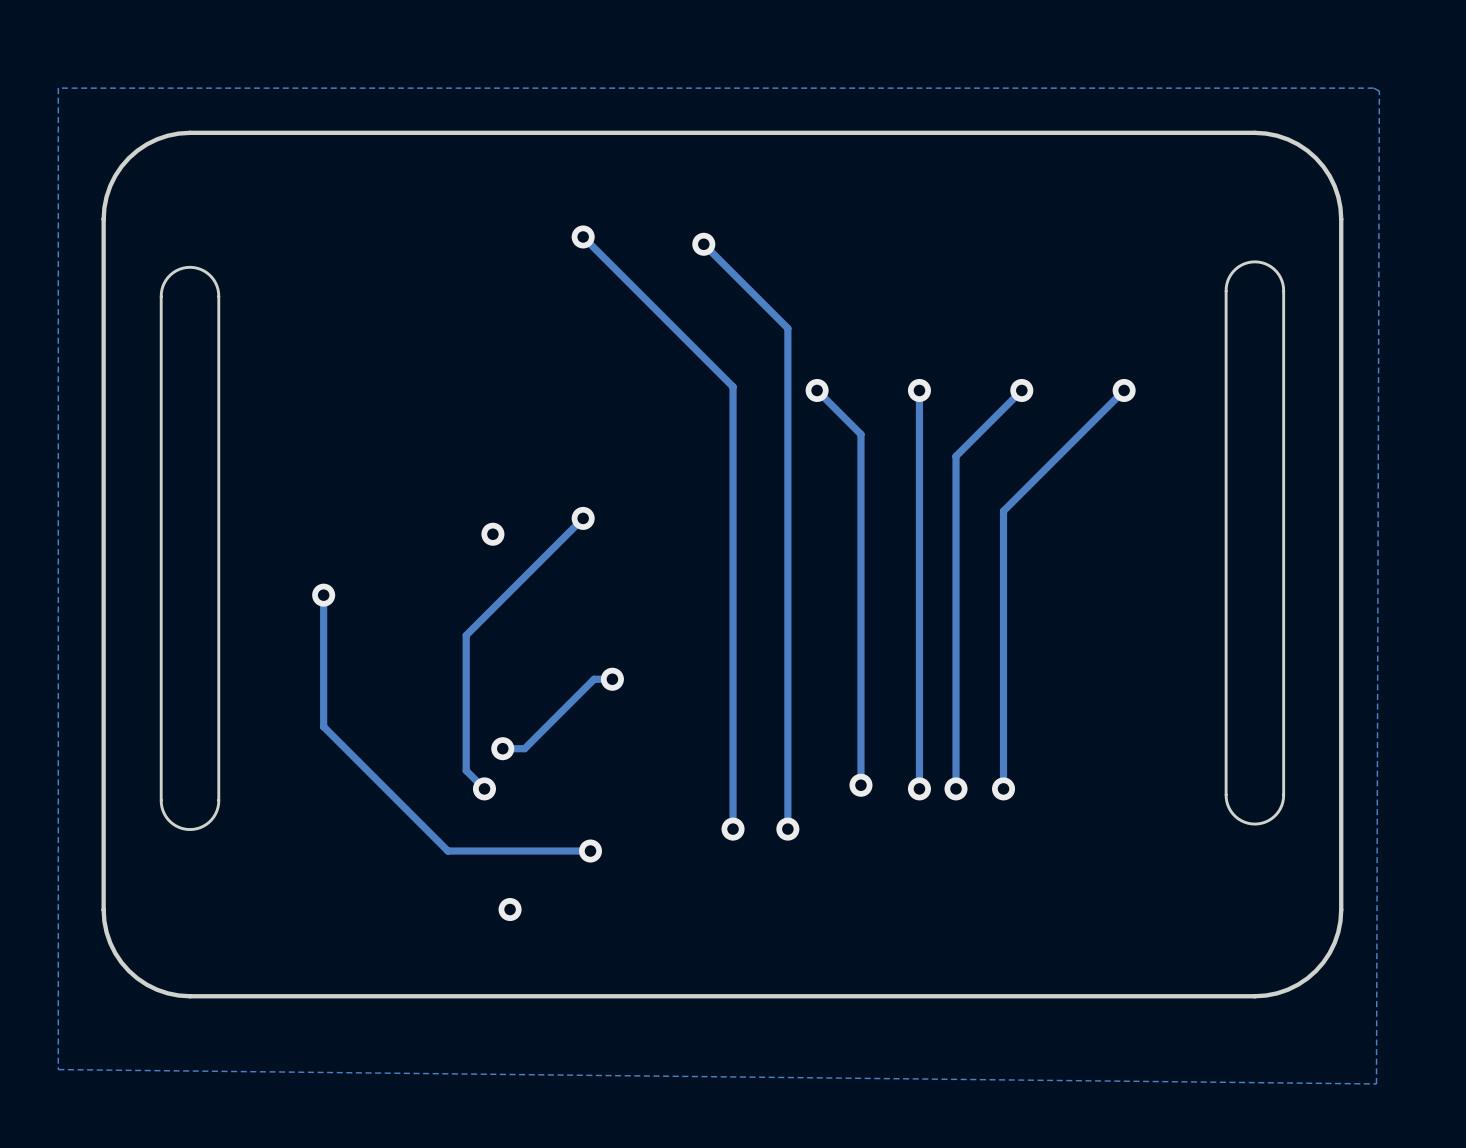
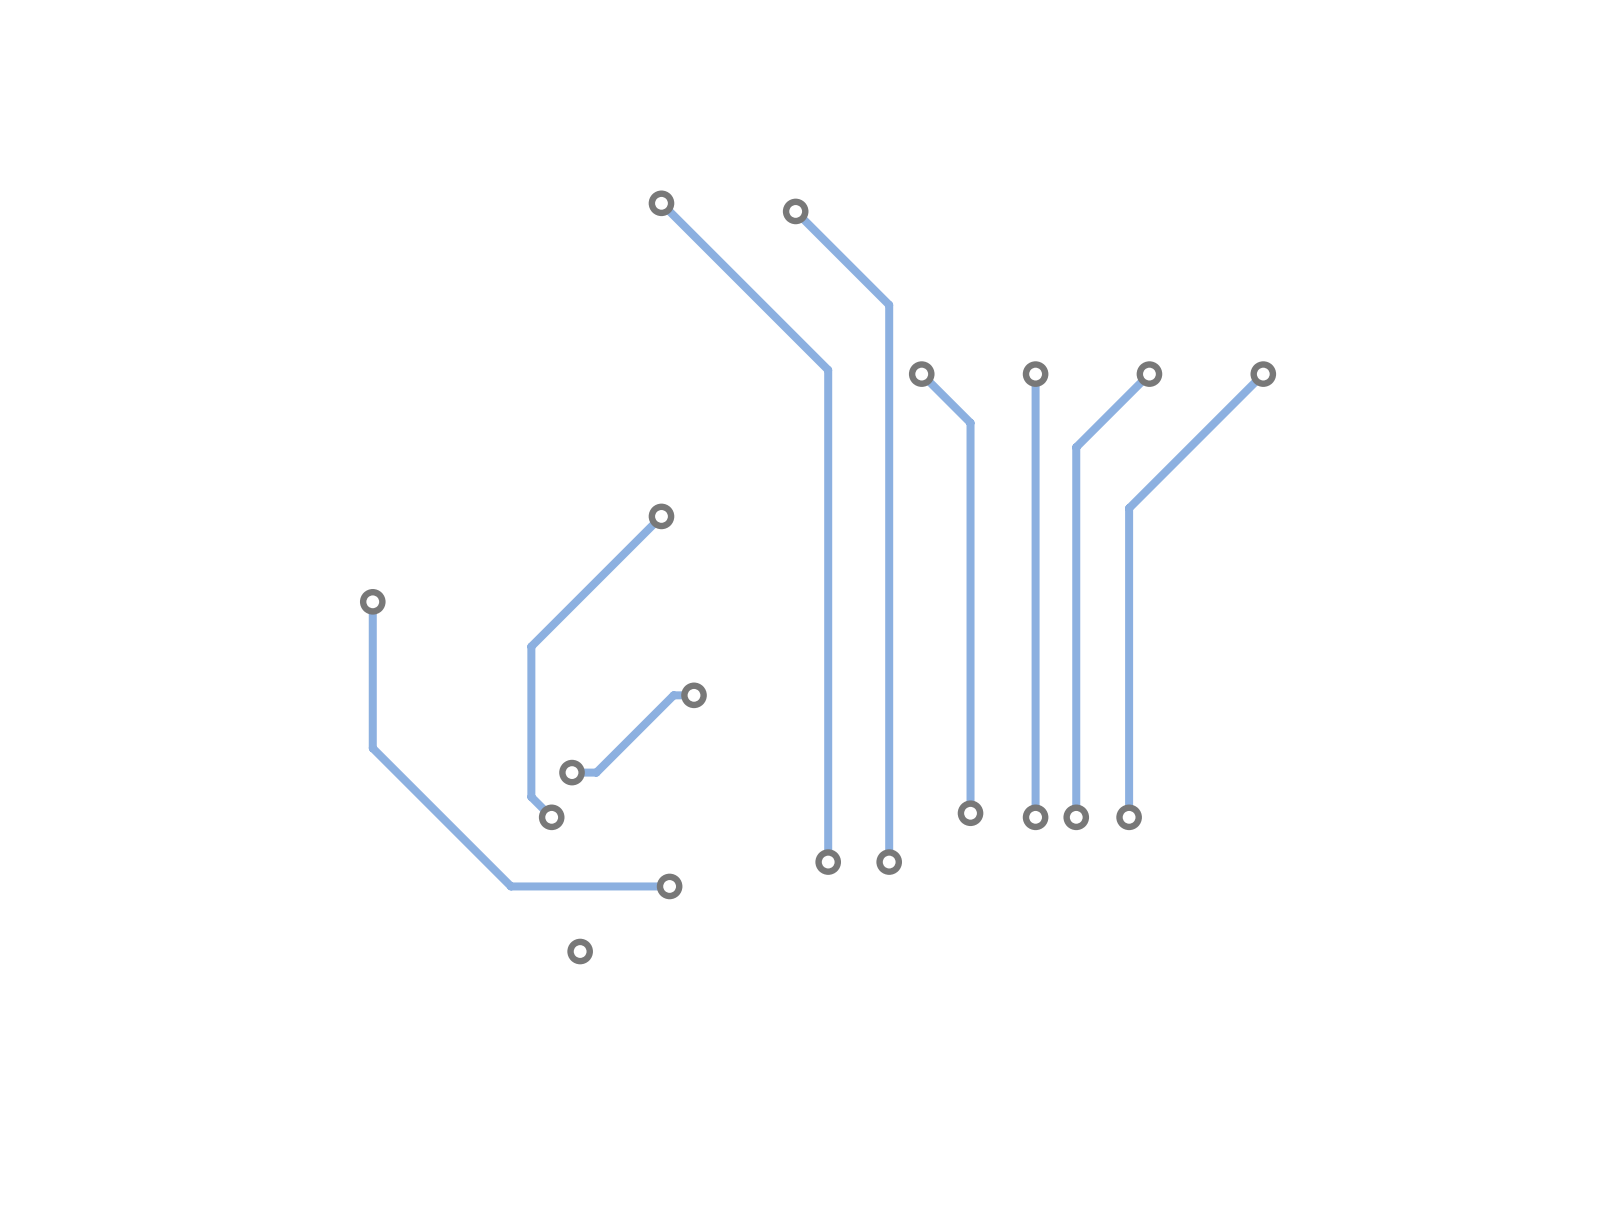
zone outline: (1373, 88) (1379, 91) (1376, 1083) (58, 1069) (58, 88) (1373, 88) -> none
board edge: (1254, 132) (189, 132) (167, 135) (137, 150) (121, 166) (110, 186) (103, 219) (103, 909) (110, 942) (121, 962) (146, 984) (167, 993) (189, 996) (1254, 996) (1277, 993) (1307, 978) (1329, 953) (1338, 932) (1341, 909) (1341, 219) (1334, 186) (1315, 158) (1287, 139) (1254, 132) -> none
board edge: (1283, 291) (1283, 798) (1280, 808) (1274, 816) (1265, 822) (1254, 824) (1244, 822) (1235, 816) (1229, 808) (1226, 798) (1226, 287) (1229, 277) (1235, 269) (1244, 263) (1258, 262) (1268, 265) (1276, 271) (1281, 280) (1283, 291) -> none
board edge: (218, 296) (218, 803) (215, 813) (209, 822) (200, 827) (189, 829) (179, 827) (170, 822) (164, 813) (161, 803) (161, 293) (164, 283) (170, 274) (179, 269) (193, 267) (203, 270) (211, 277) (217, 286) (218, 296) -> none
via: (492, 534) -> none

